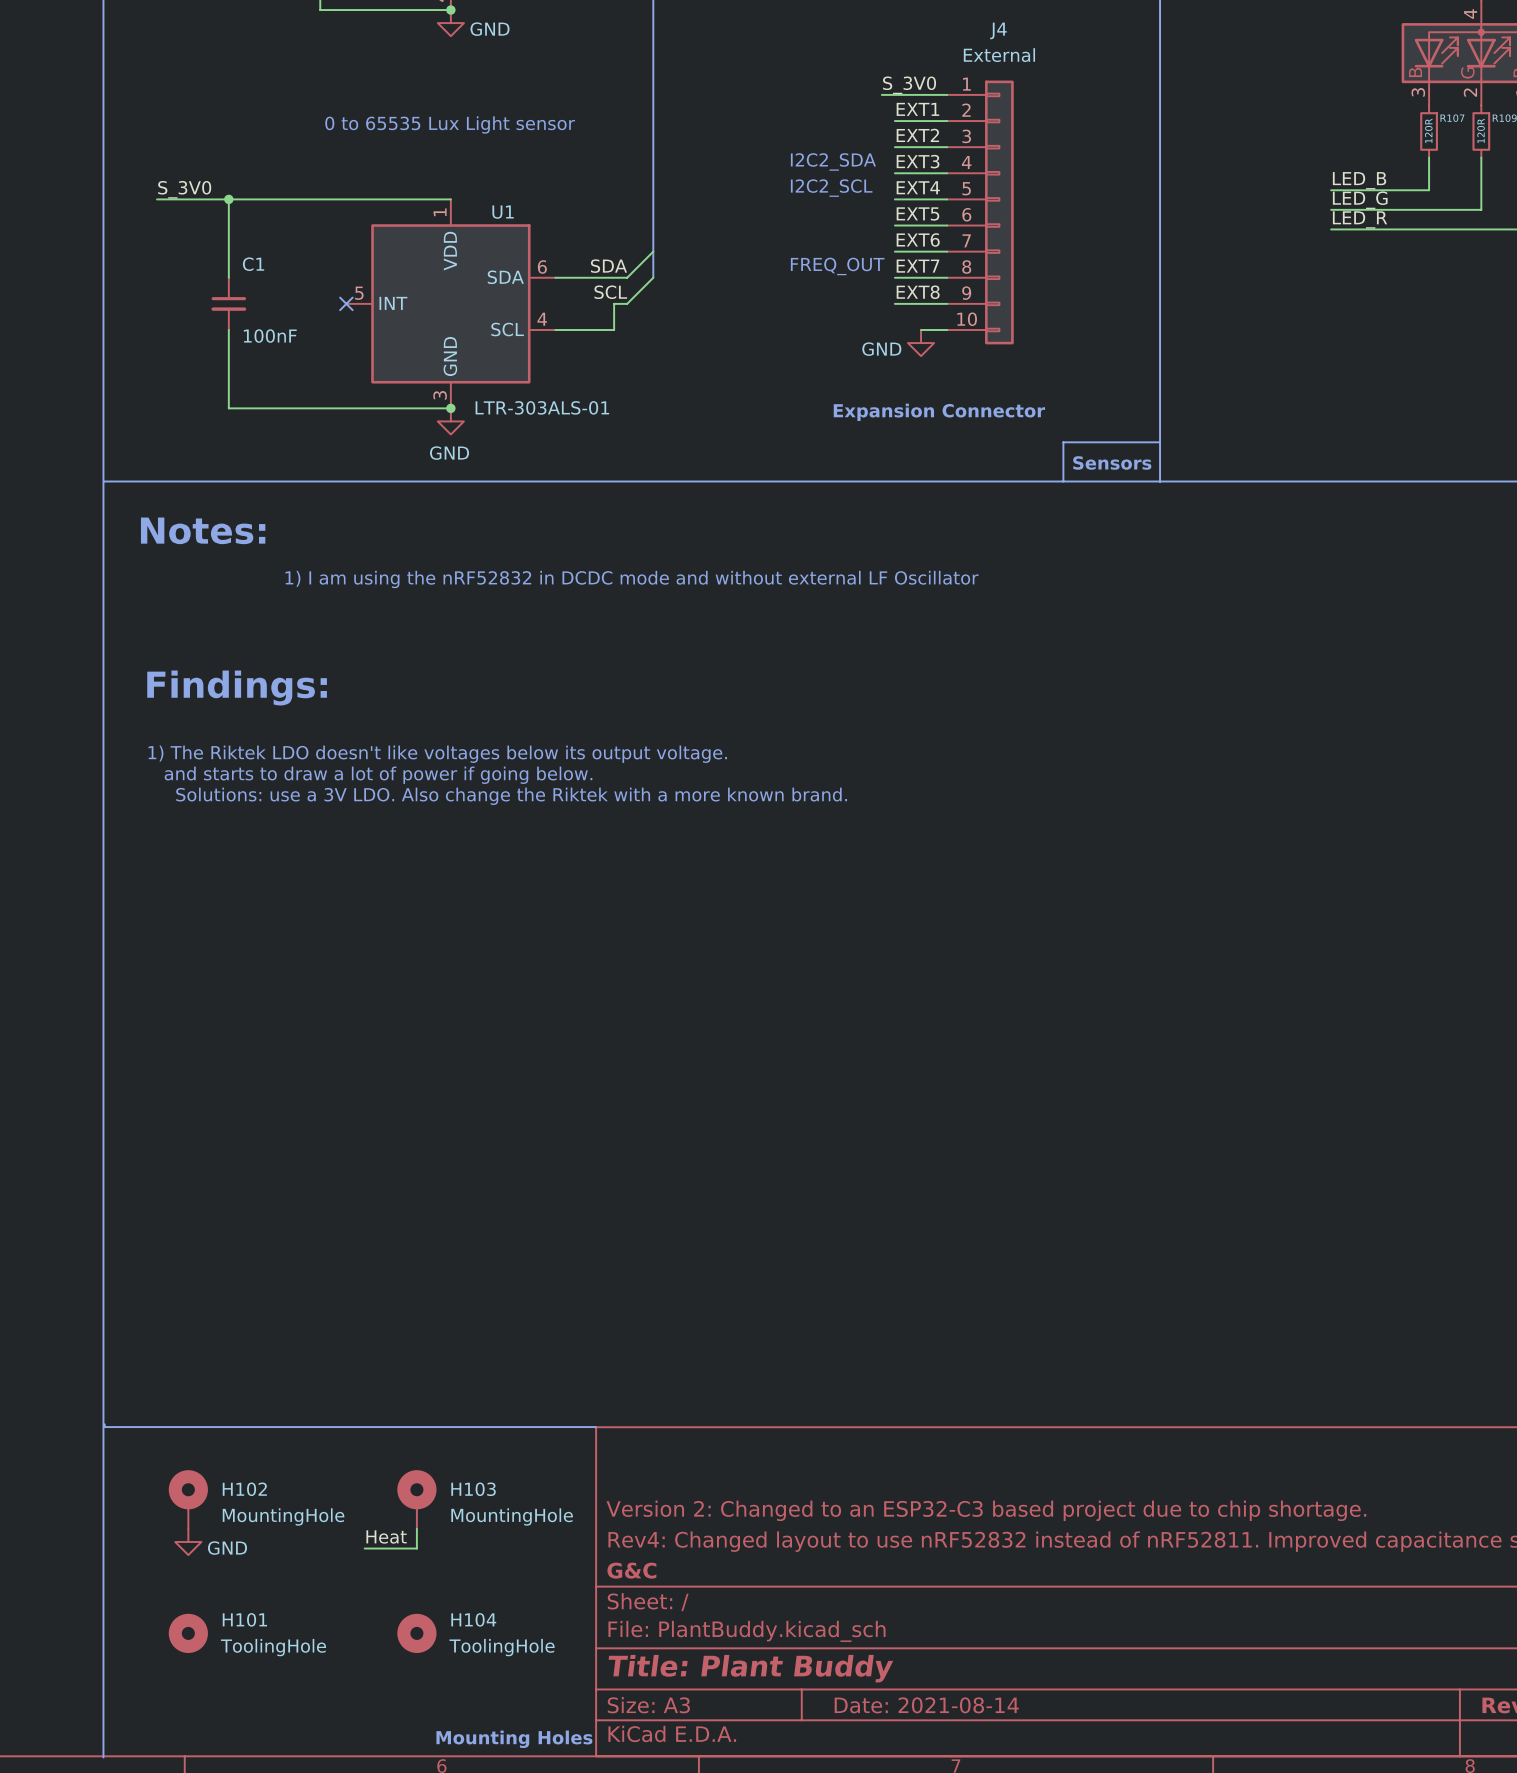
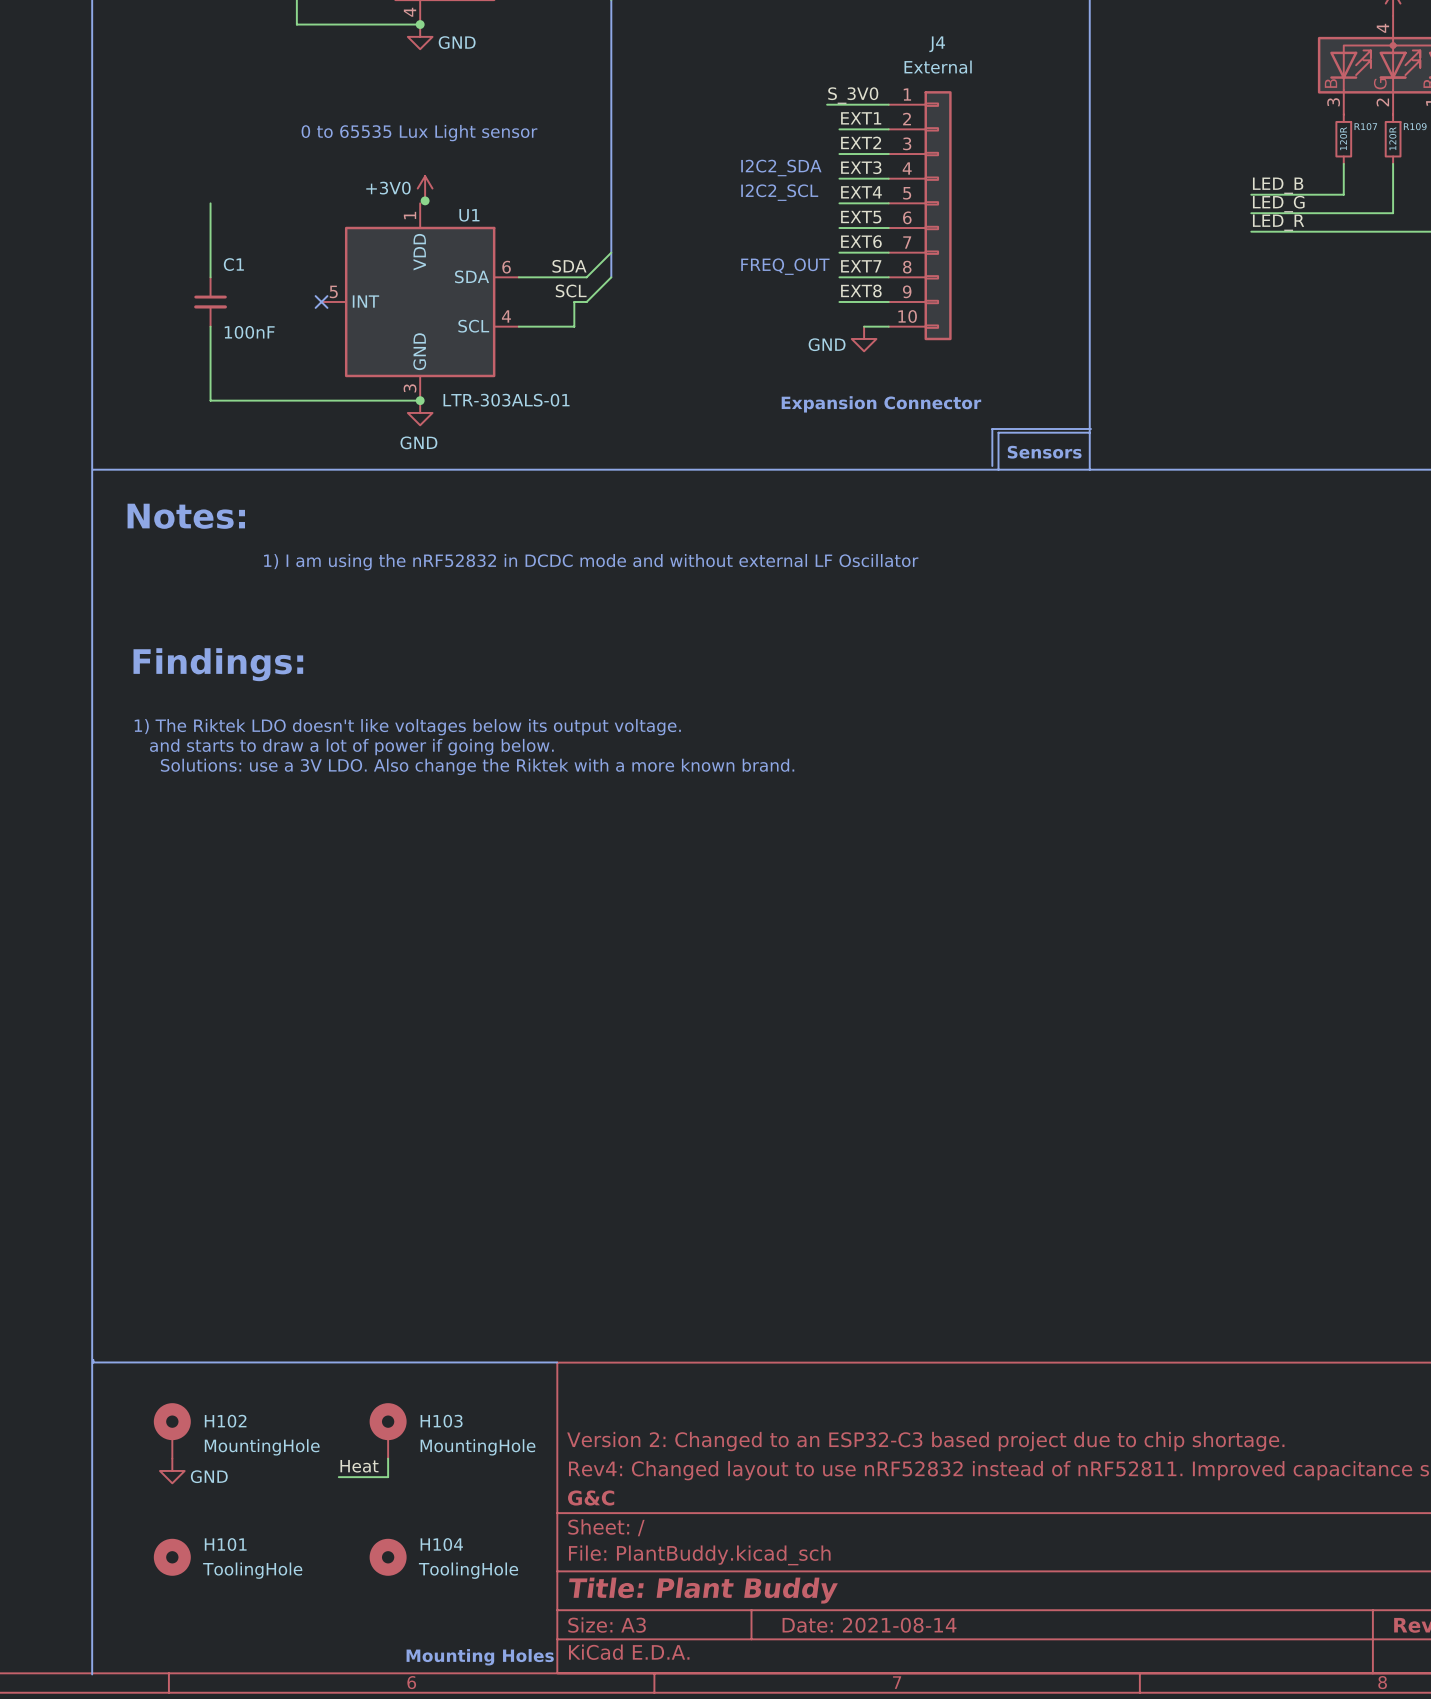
power symbol: none -> +3V0 (425, 188)
label: S_3V0 (184, 189) -> none
junction: none -> (425, 200)
wire: (157, 199) (450, 199) -> none
junction: (228, 199) -> none
line: none -> (1090, 429) (992, 429) (992, 465)

